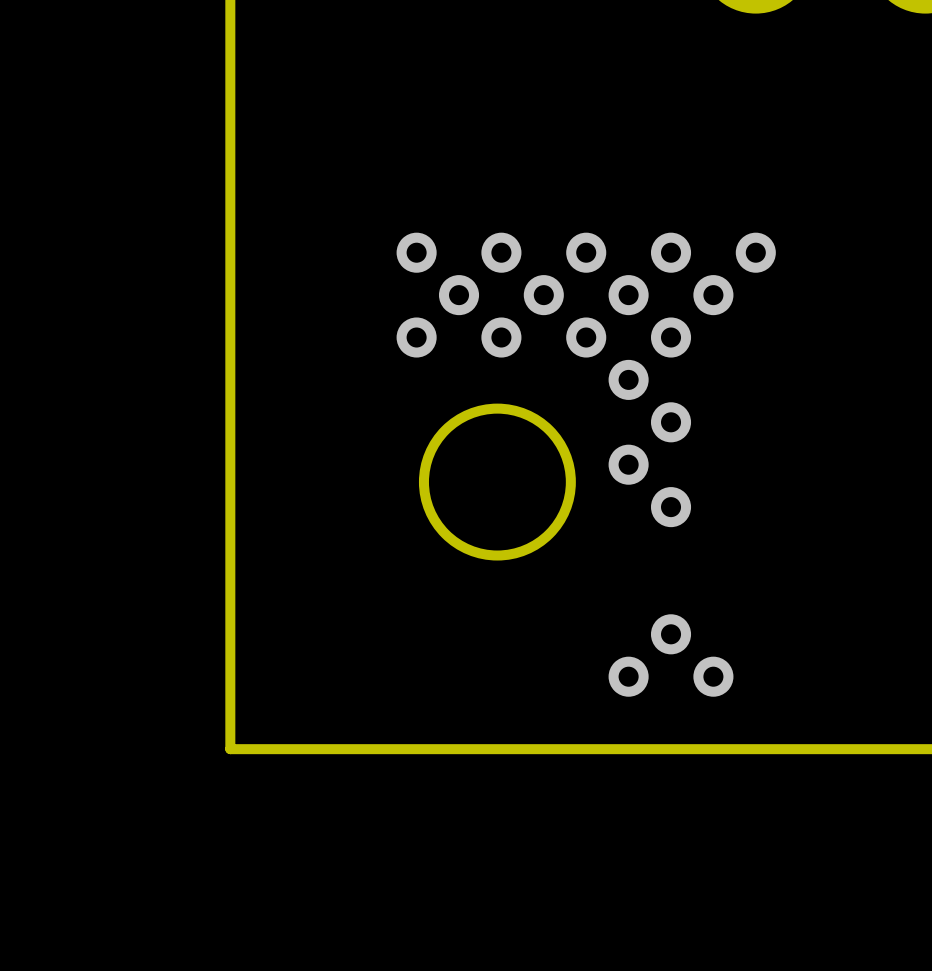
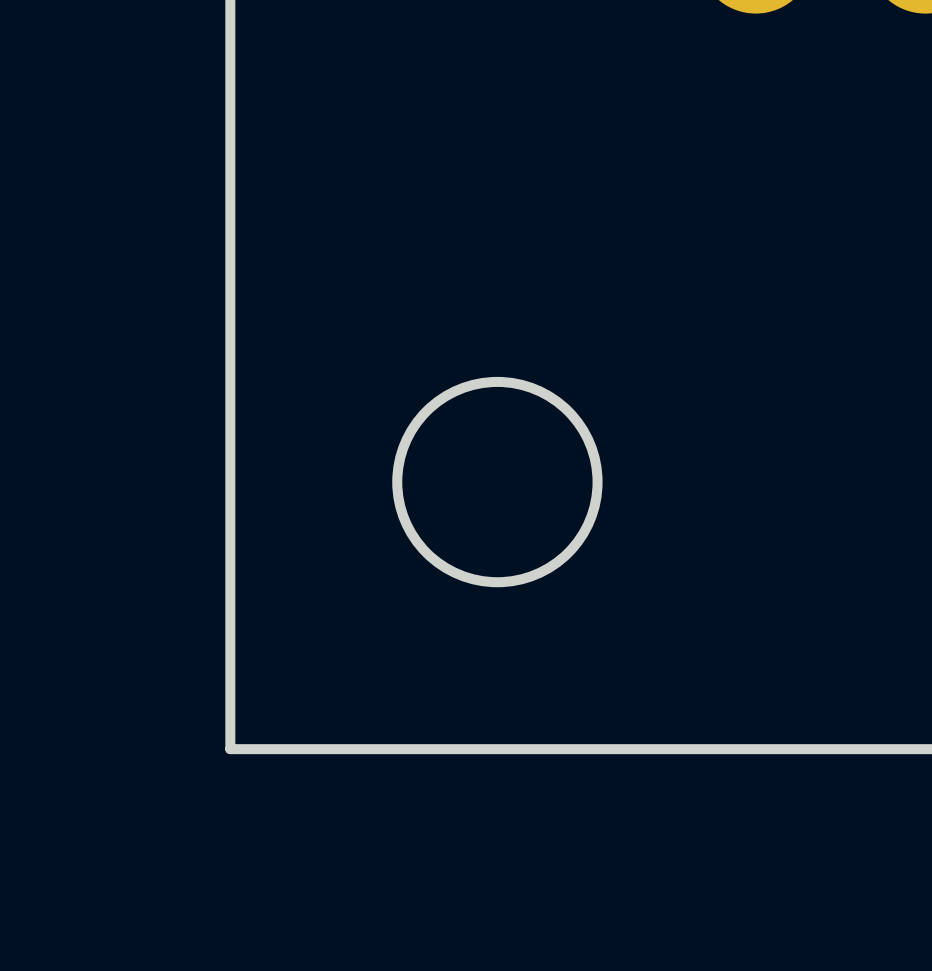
via: (416, 252) -> none
via: (501, 252) -> none
via: (586, 252) -> none
via: (671, 252) -> none
via: (755, 252) -> none
via: (459, 295) -> none
via: (543, 295) -> none
via: (628, 295) -> none
via: (713, 295) -> none
via: (416, 337) -> none
via: (501, 337) -> none
via: (586, 337) -> none
via: (671, 337) -> none
via: (628, 379) -> none
round board edge size: [418, 403, 576, 561] -> [392, 376, 603, 588]
via: (671, 422) -> none
via: (628, 464) -> none
via: (671, 507) -> none
via: (671, 634) -> none
via: (628, 676) -> none
via: (713, 676) -> none

